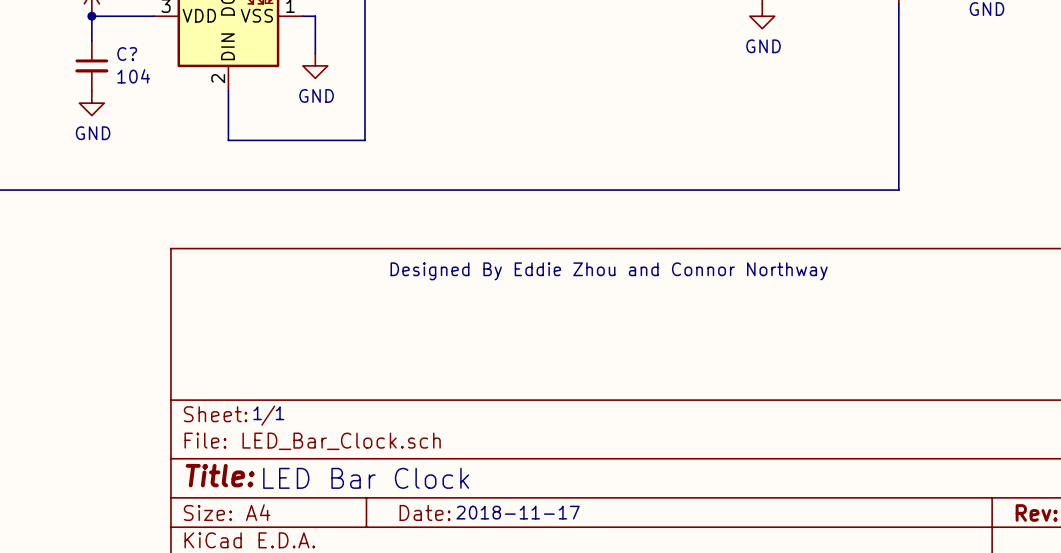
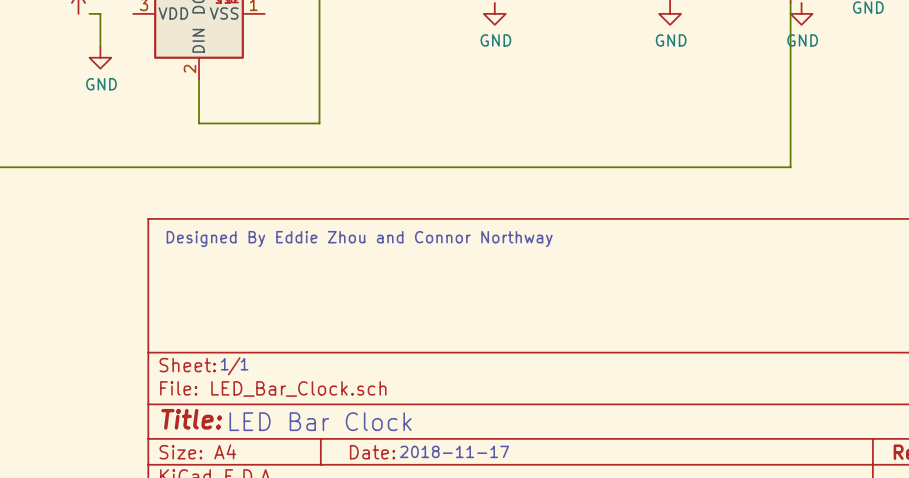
junction: (91, 16) -> none
wire: (104, 16) (91, 16) (91, 41) -> none
wire: (116, 16) (153, 16) -> (100, 13) (100, 46)
wire: (302, 16) (315, 16) (315, 53) -> none
power symbol: none -> GND (494, 13)
power symbol: none -> GND (801, 13)
C?: 104 (91, 65) -> none
power symbol: GND (315, 65) -> none
power symbol position: GND (91, 103) -> GND (100, 57)
text position: Designed By Eddie Zhou and Connor Northway (609, 271) -> Designed By Eddie Zhou and Connor Northway (359, 239)

